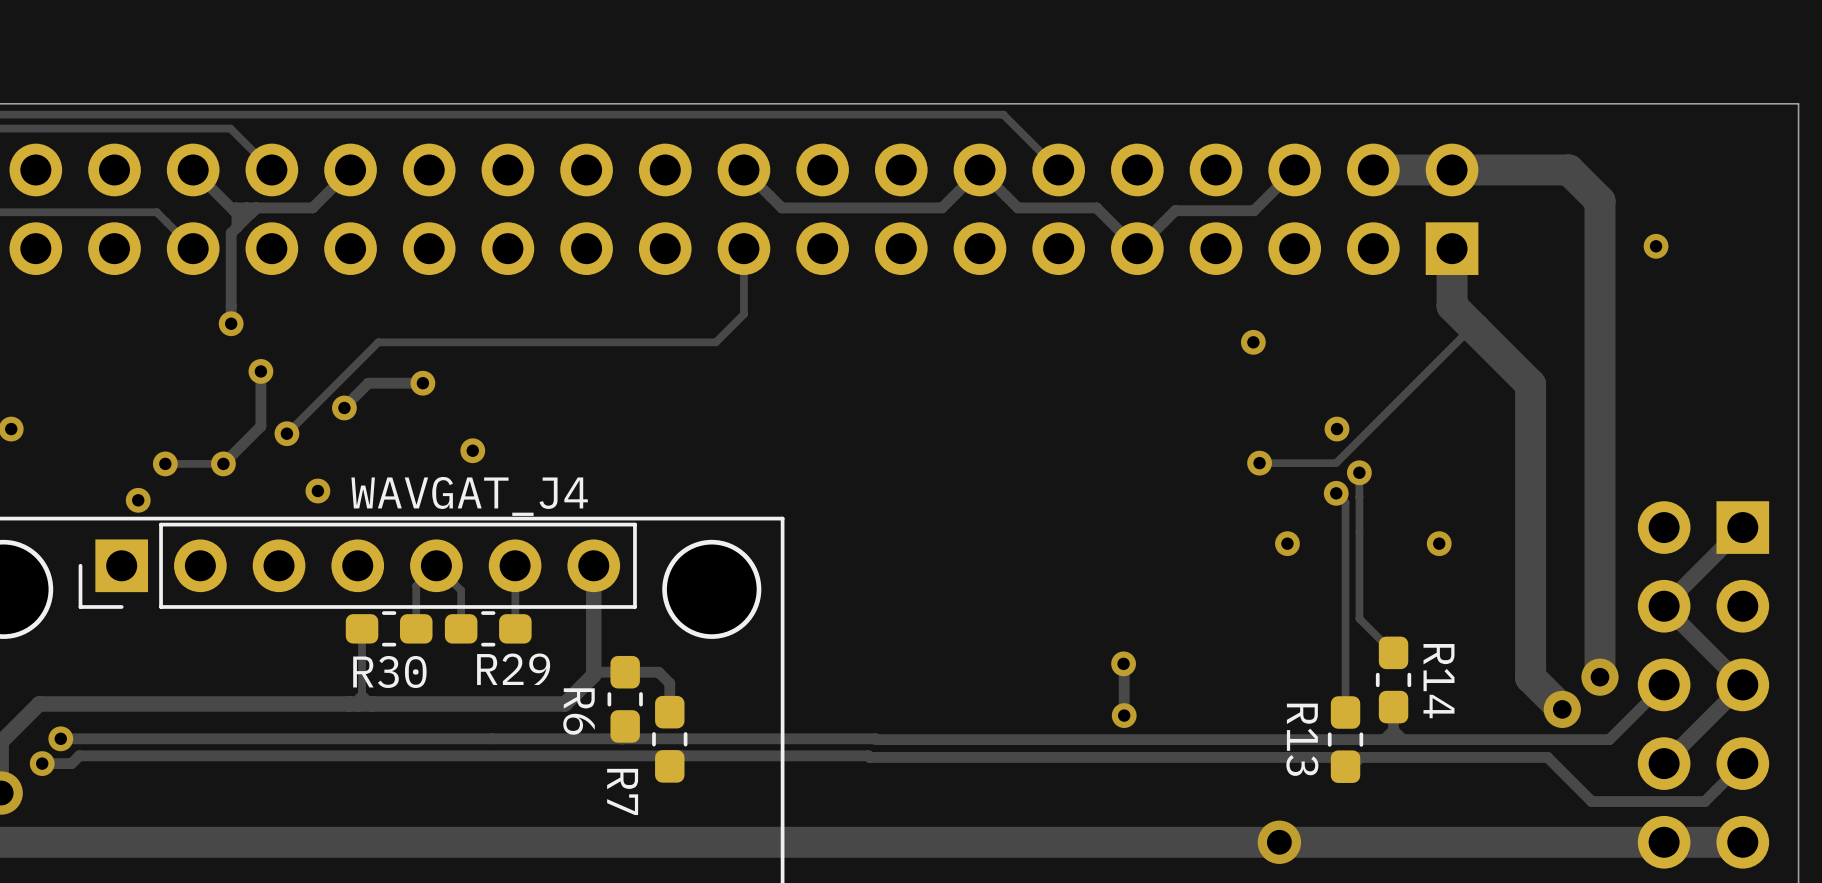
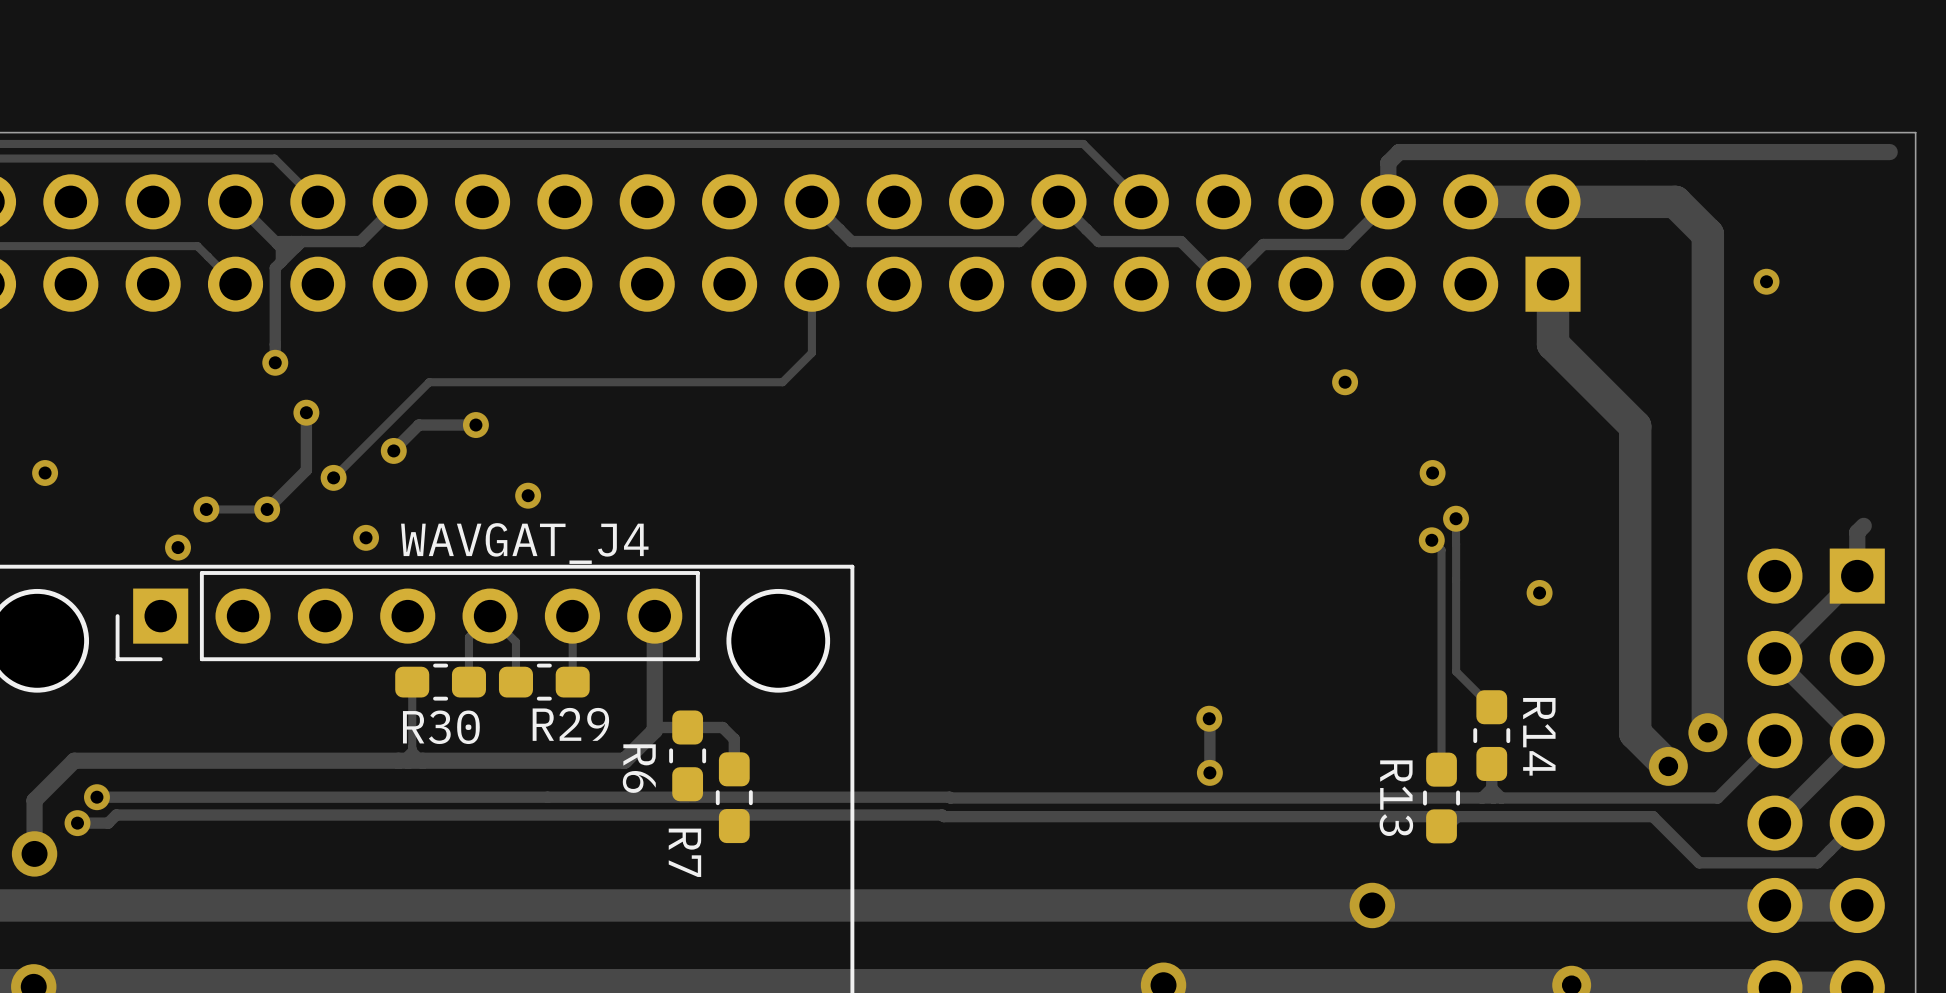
track: none -> (1889, 152) (1399, 152) (1388, 162) (1388, 201)
track: (1474, 328) (1470, 328) (1336, 463) (1259, 463) -> none
via: (1259, 463) -> none
track: none -> (1863, 525) (1857, 532) (1857, 576)
via: (1287, 543) -> none

